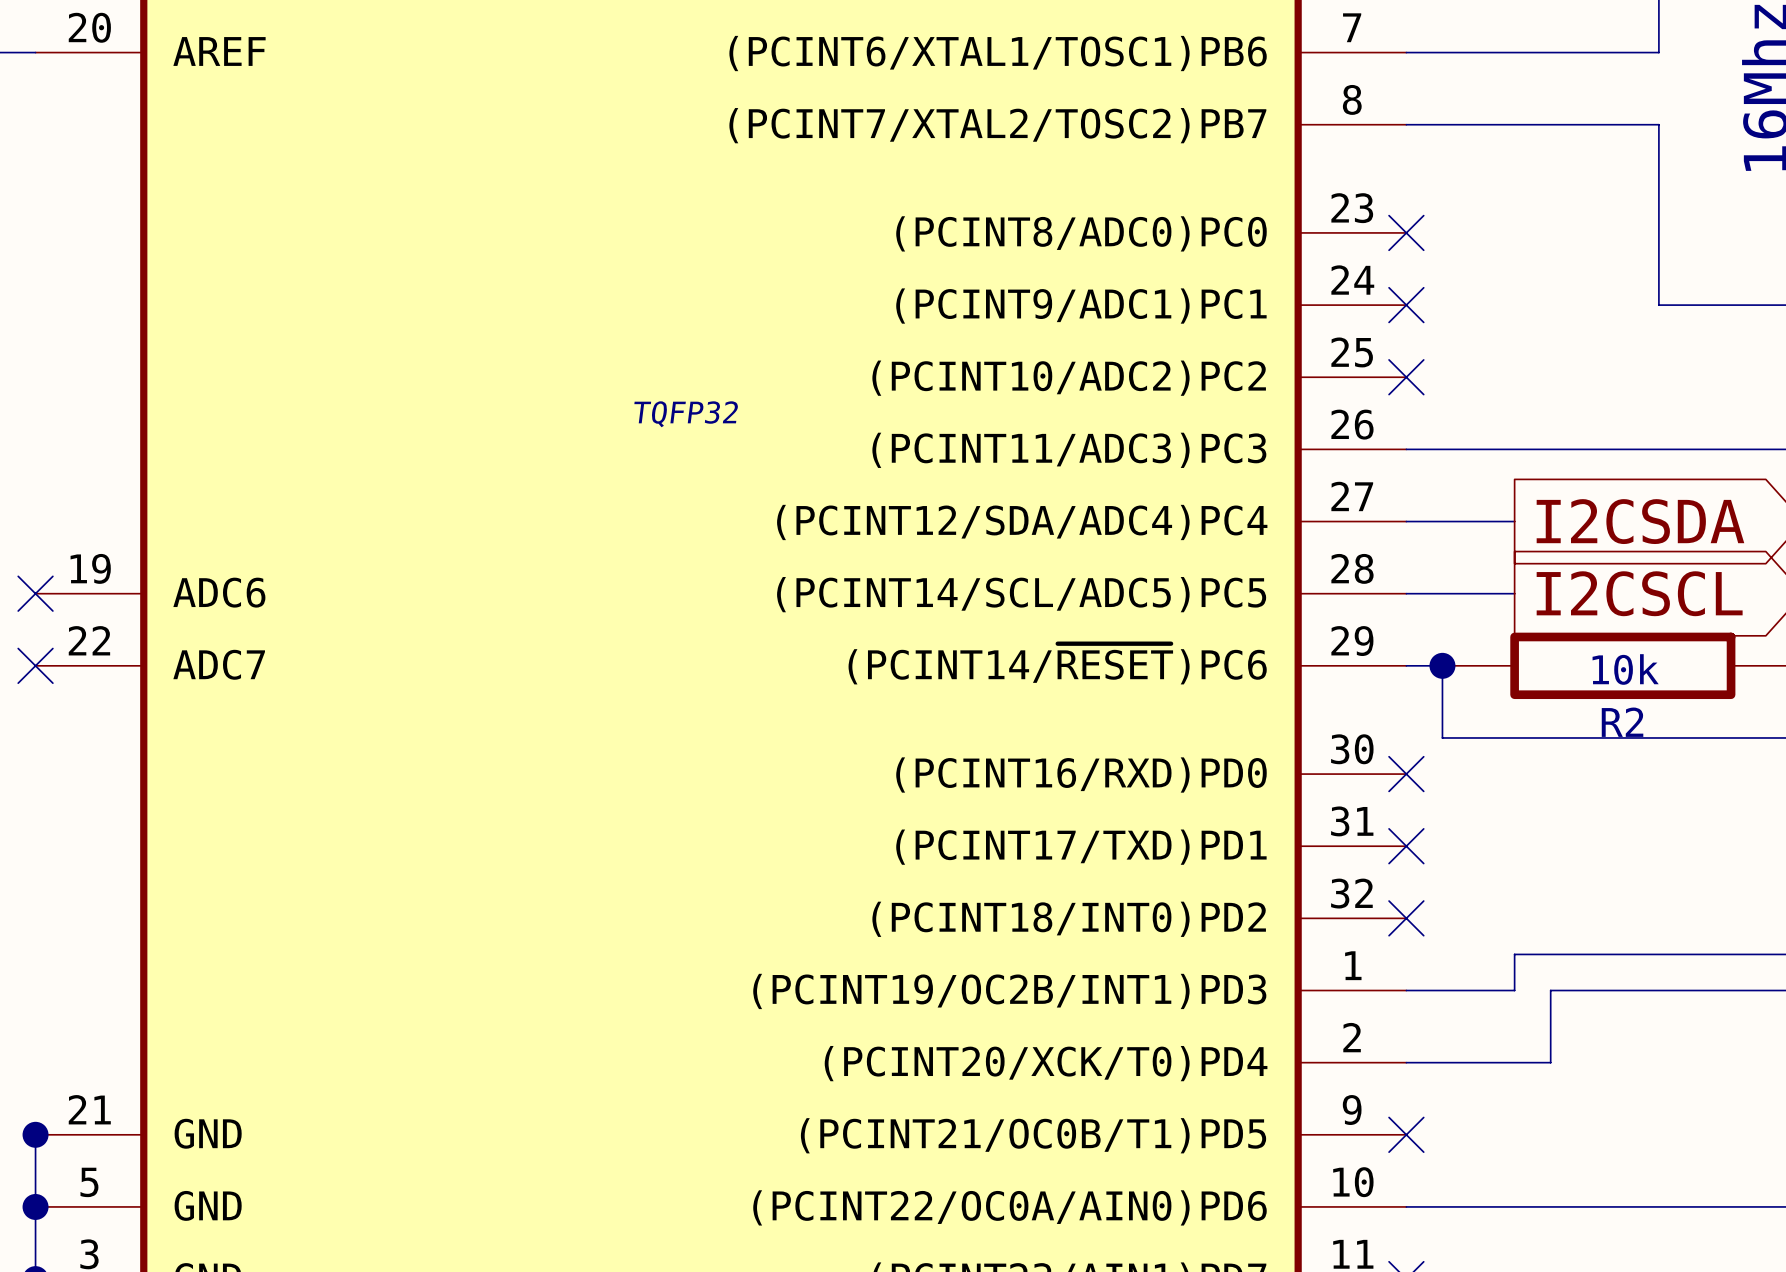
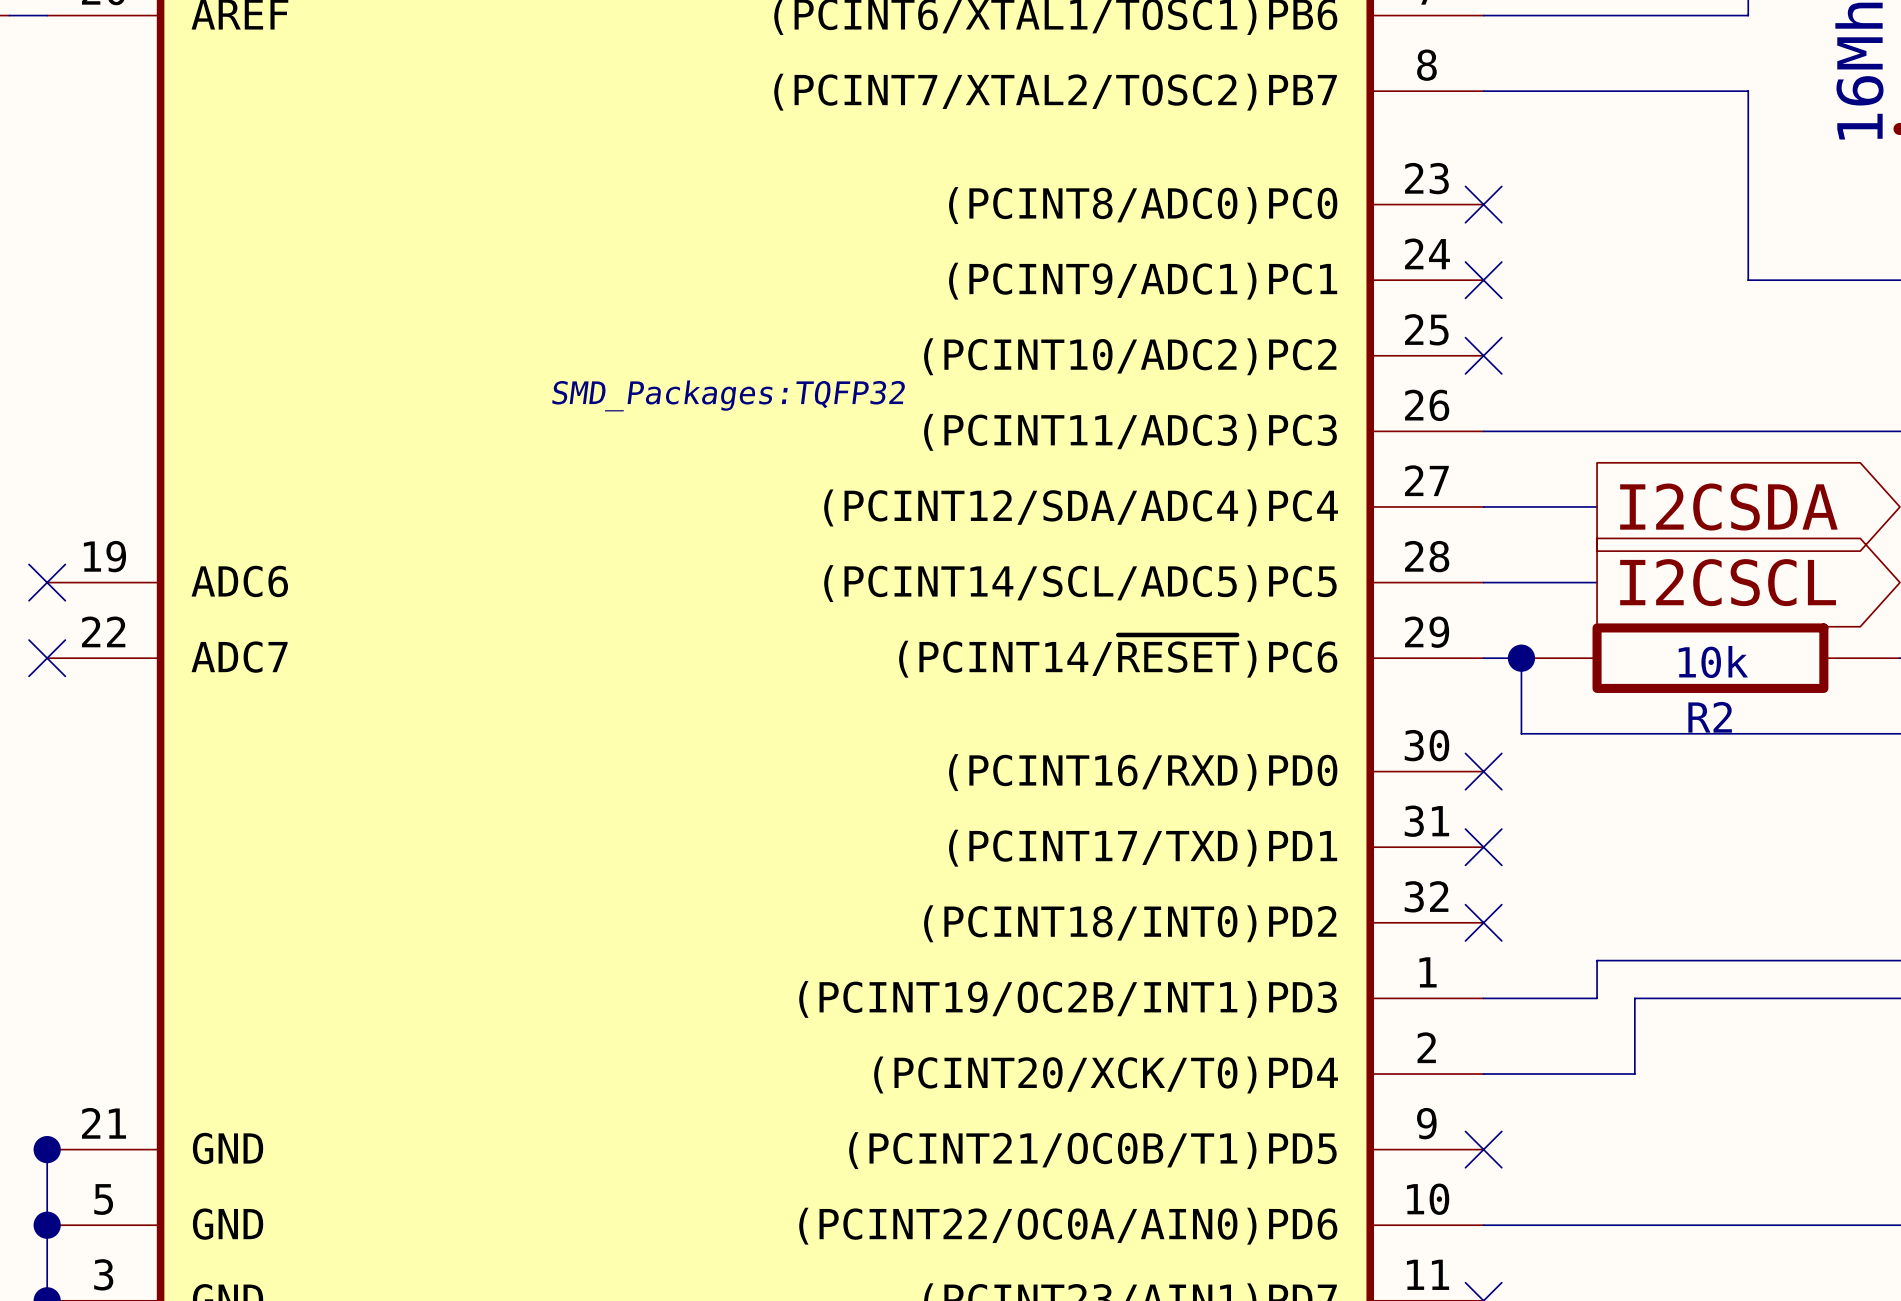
part text: TQFP32 (686, 414) -> SMD_Packages:TQFP32 (728, 395)

